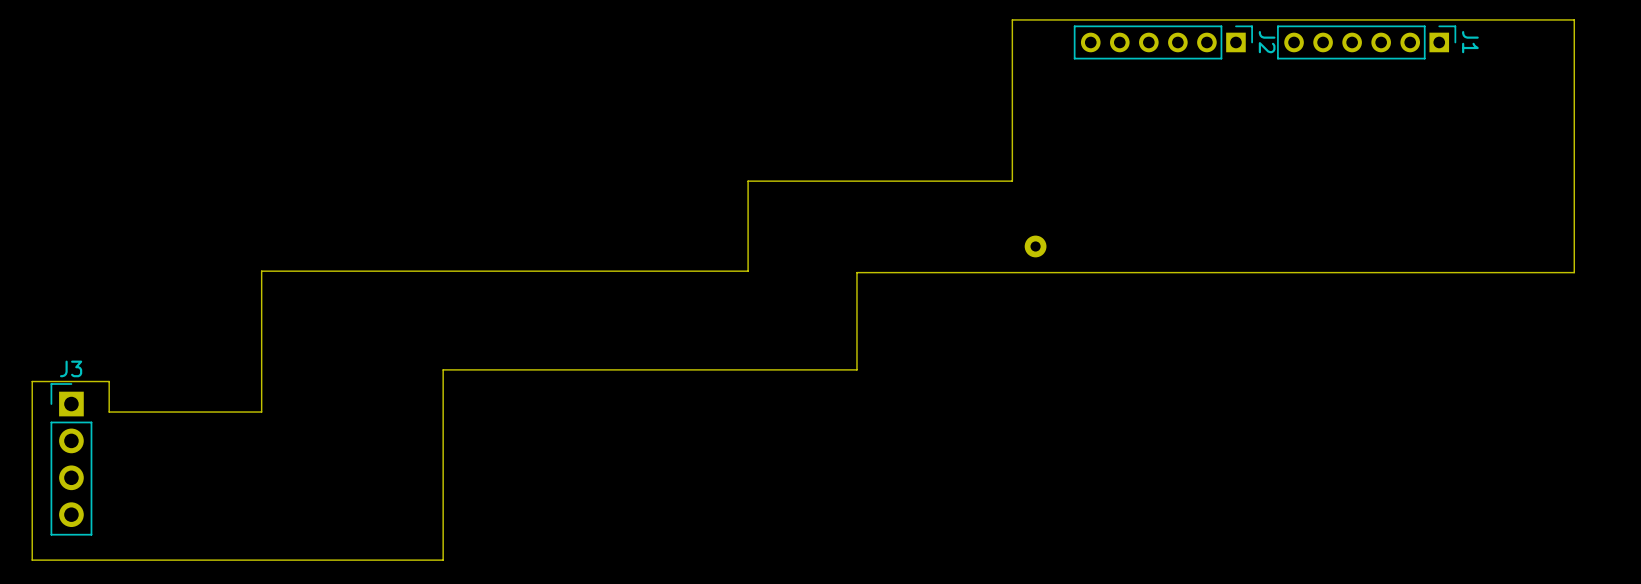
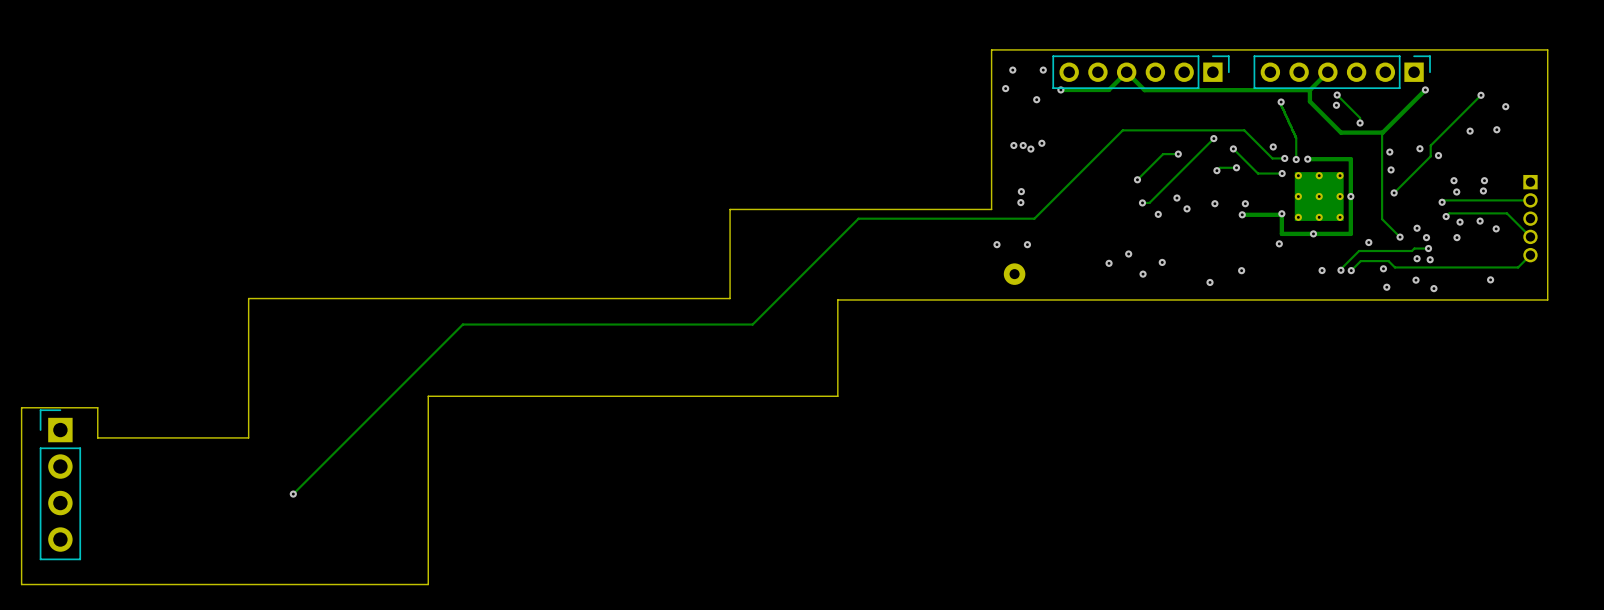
via: none -> (1012, 70)
via: none -> (1043, 70)
J2 name: J2 (1267, 42) -> none
track: none -> (1327, 72) (1309, 90)
J1 name: J1 (1470, 42) -> none
via: none -> (1005, 88)
track: none -> (1060, 89) (1108, 89) (1126, 72) (1144, 90) (1309, 90)
via: none -> (1060, 89)
track: none -> (1425, 89) (1382, 132) (1340, 132) (1309, 101) (1309, 90)
via: none -> (1425, 89)
track: none -> (1337, 95) (1360, 117) (1360, 123)
via: none -> (1337, 95)
track: none -> (1481, 95) (1430, 145) (1430, 156) (1394, 192)
via: none -> (1481, 95)
via: none -> (1036, 99)
track: none -> (1281, 102) (1296, 137) (1296, 159)
via: none -> (1281, 102)
via: none -> (1336, 105)
via: none -> (1505, 106)
via: none -> (1360, 123)
via: none -> (1496, 129)
via: none -> (1470, 131)
track: none -> (1382, 132) (1382, 219) (1400, 237)
track: none -> (1213, 138) (1149, 202) (1142, 202)
via: none -> (1213, 138)
via: none -> (1041, 143)
via: none -> (1013, 145)
via: none -> (1023, 145)
via: none -> (1273, 146)
track: none -> (1233, 148) (1258, 173) (1282, 173)
via: none -> (1233, 148)
via: none -> (1419, 148)
via: none -> (1030, 149)
via: none -> (1389, 152)
track: none -> (1178, 154) (1163, 154) (1137, 179)
via: none -> (1178, 154)
via: none -> (1438, 155)
track: none -> (1284, 158) (1272, 158) (1244, 130) (1122, 130) (1034, 218) (858, 218) (752, 324) (462, 324) (293, 494)
via: none -> (1284, 158)
via: none -> (1296, 159)
track: none -> (1307, 159) (1350, 159) (1350, 233) (1281, 233) (1281, 213) (1242, 214)
via: none -> (1307, 159)
track: none -> (1236, 167) (1219, 167) (1216, 170)
via: none -> (1236, 167)
via: none -> (1216, 170)
via: none -> (1391, 169)
via: none -> (1282, 173)
via: none -> (1137, 179)
via: none -> (1454, 180)
via: none -> (1484, 180)
via: none -> (1483, 190)
via: none -> (1021, 191)
via: none -> (1456, 191)
via: none -> (1394, 192)
part: none -> (1319, 196)
via: none -> (1350, 196)
via: none -> (1176, 198)
track: none -> (1530, 200) (1443, 200) (1442, 202)
via: none -> (1442, 202)
via: none -> (1020, 202)
via: none -> (1142, 202)
via: none -> (1214, 203)
via: none -> (1245, 203)
via: none -> (1187, 208)
via: none -> (1281, 213)
via: none -> (1158, 214)
via: none -> (1242, 214)
track: none -> (1446, 216) (1449, 213) (1506, 213) (1530, 236)
via: none -> (1446, 216)
part: none -> (1530, 218)
via: none -> (1480, 221)
via: none -> (1460, 222)
via: none -> (1417, 228)
via: none -> (1496, 228)
via: none -> (1313, 233)
via: none -> (1400, 237)
via: none -> (1426, 237)
via: none -> (1456, 237)
via: none -> (1368, 242)
via: none -> (1279, 243)
via: none -> (996, 244)
via: none -> (1027, 244)
track: none -> (1428, 248) (1414, 248) (1411, 251) (1359, 251) (1340, 270)
via: none -> (1428, 248)
via: none -> (1128, 254)
track: none -> (1530, 255) (1518, 267) (1394, 267) (1388, 261) (1360, 261) (1351, 270)
via: none -> (1417, 258)
via: none -> (1430, 259)
via: none -> (1162, 262)
via: none -> (1109, 263)
via: none -> (1383, 268)
via: none -> (1322, 270)
via: none -> (1340, 270)
via: none -> (1351, 270)
via: none -> (1241, 270)
via: none -> (1143, 274)
via: none -> (1416, 280)
via: none -> (1490, 279)
via: none -> (1210, 282)
via: none -> (1386, 287)
via: none -> (1433, 288)
J3 name: J3 (71, 368) -> none
via: none -> (293, 494)

